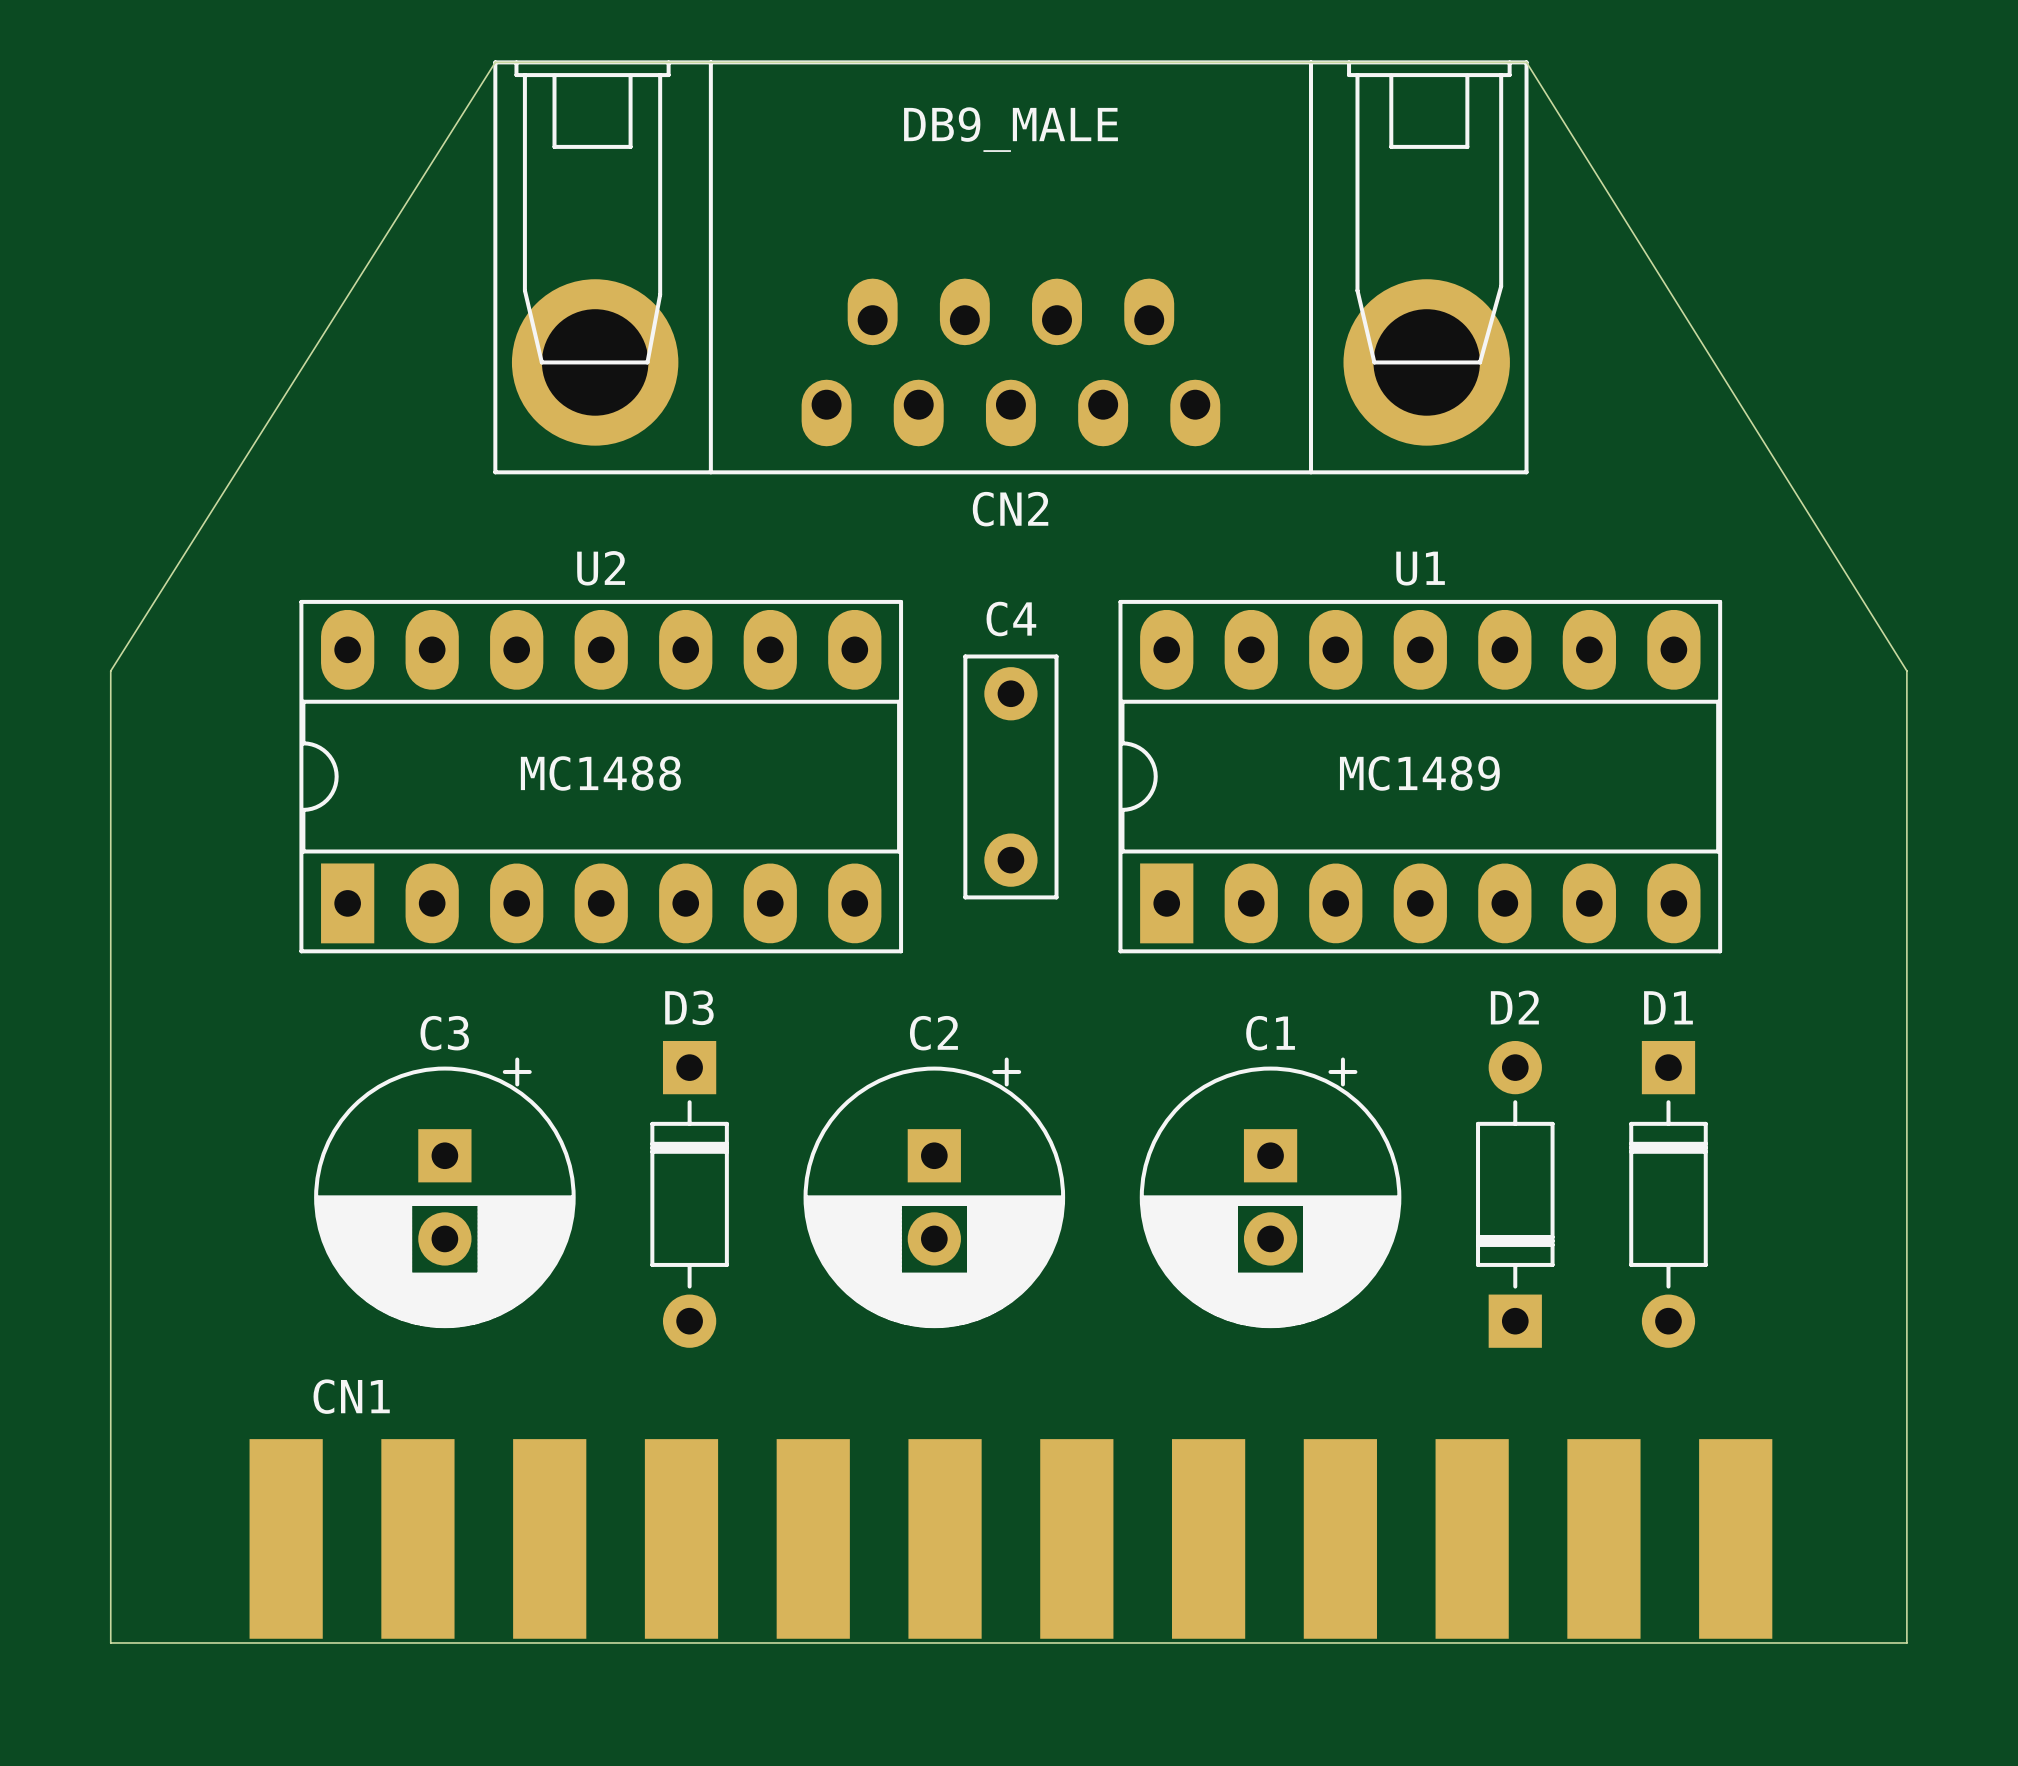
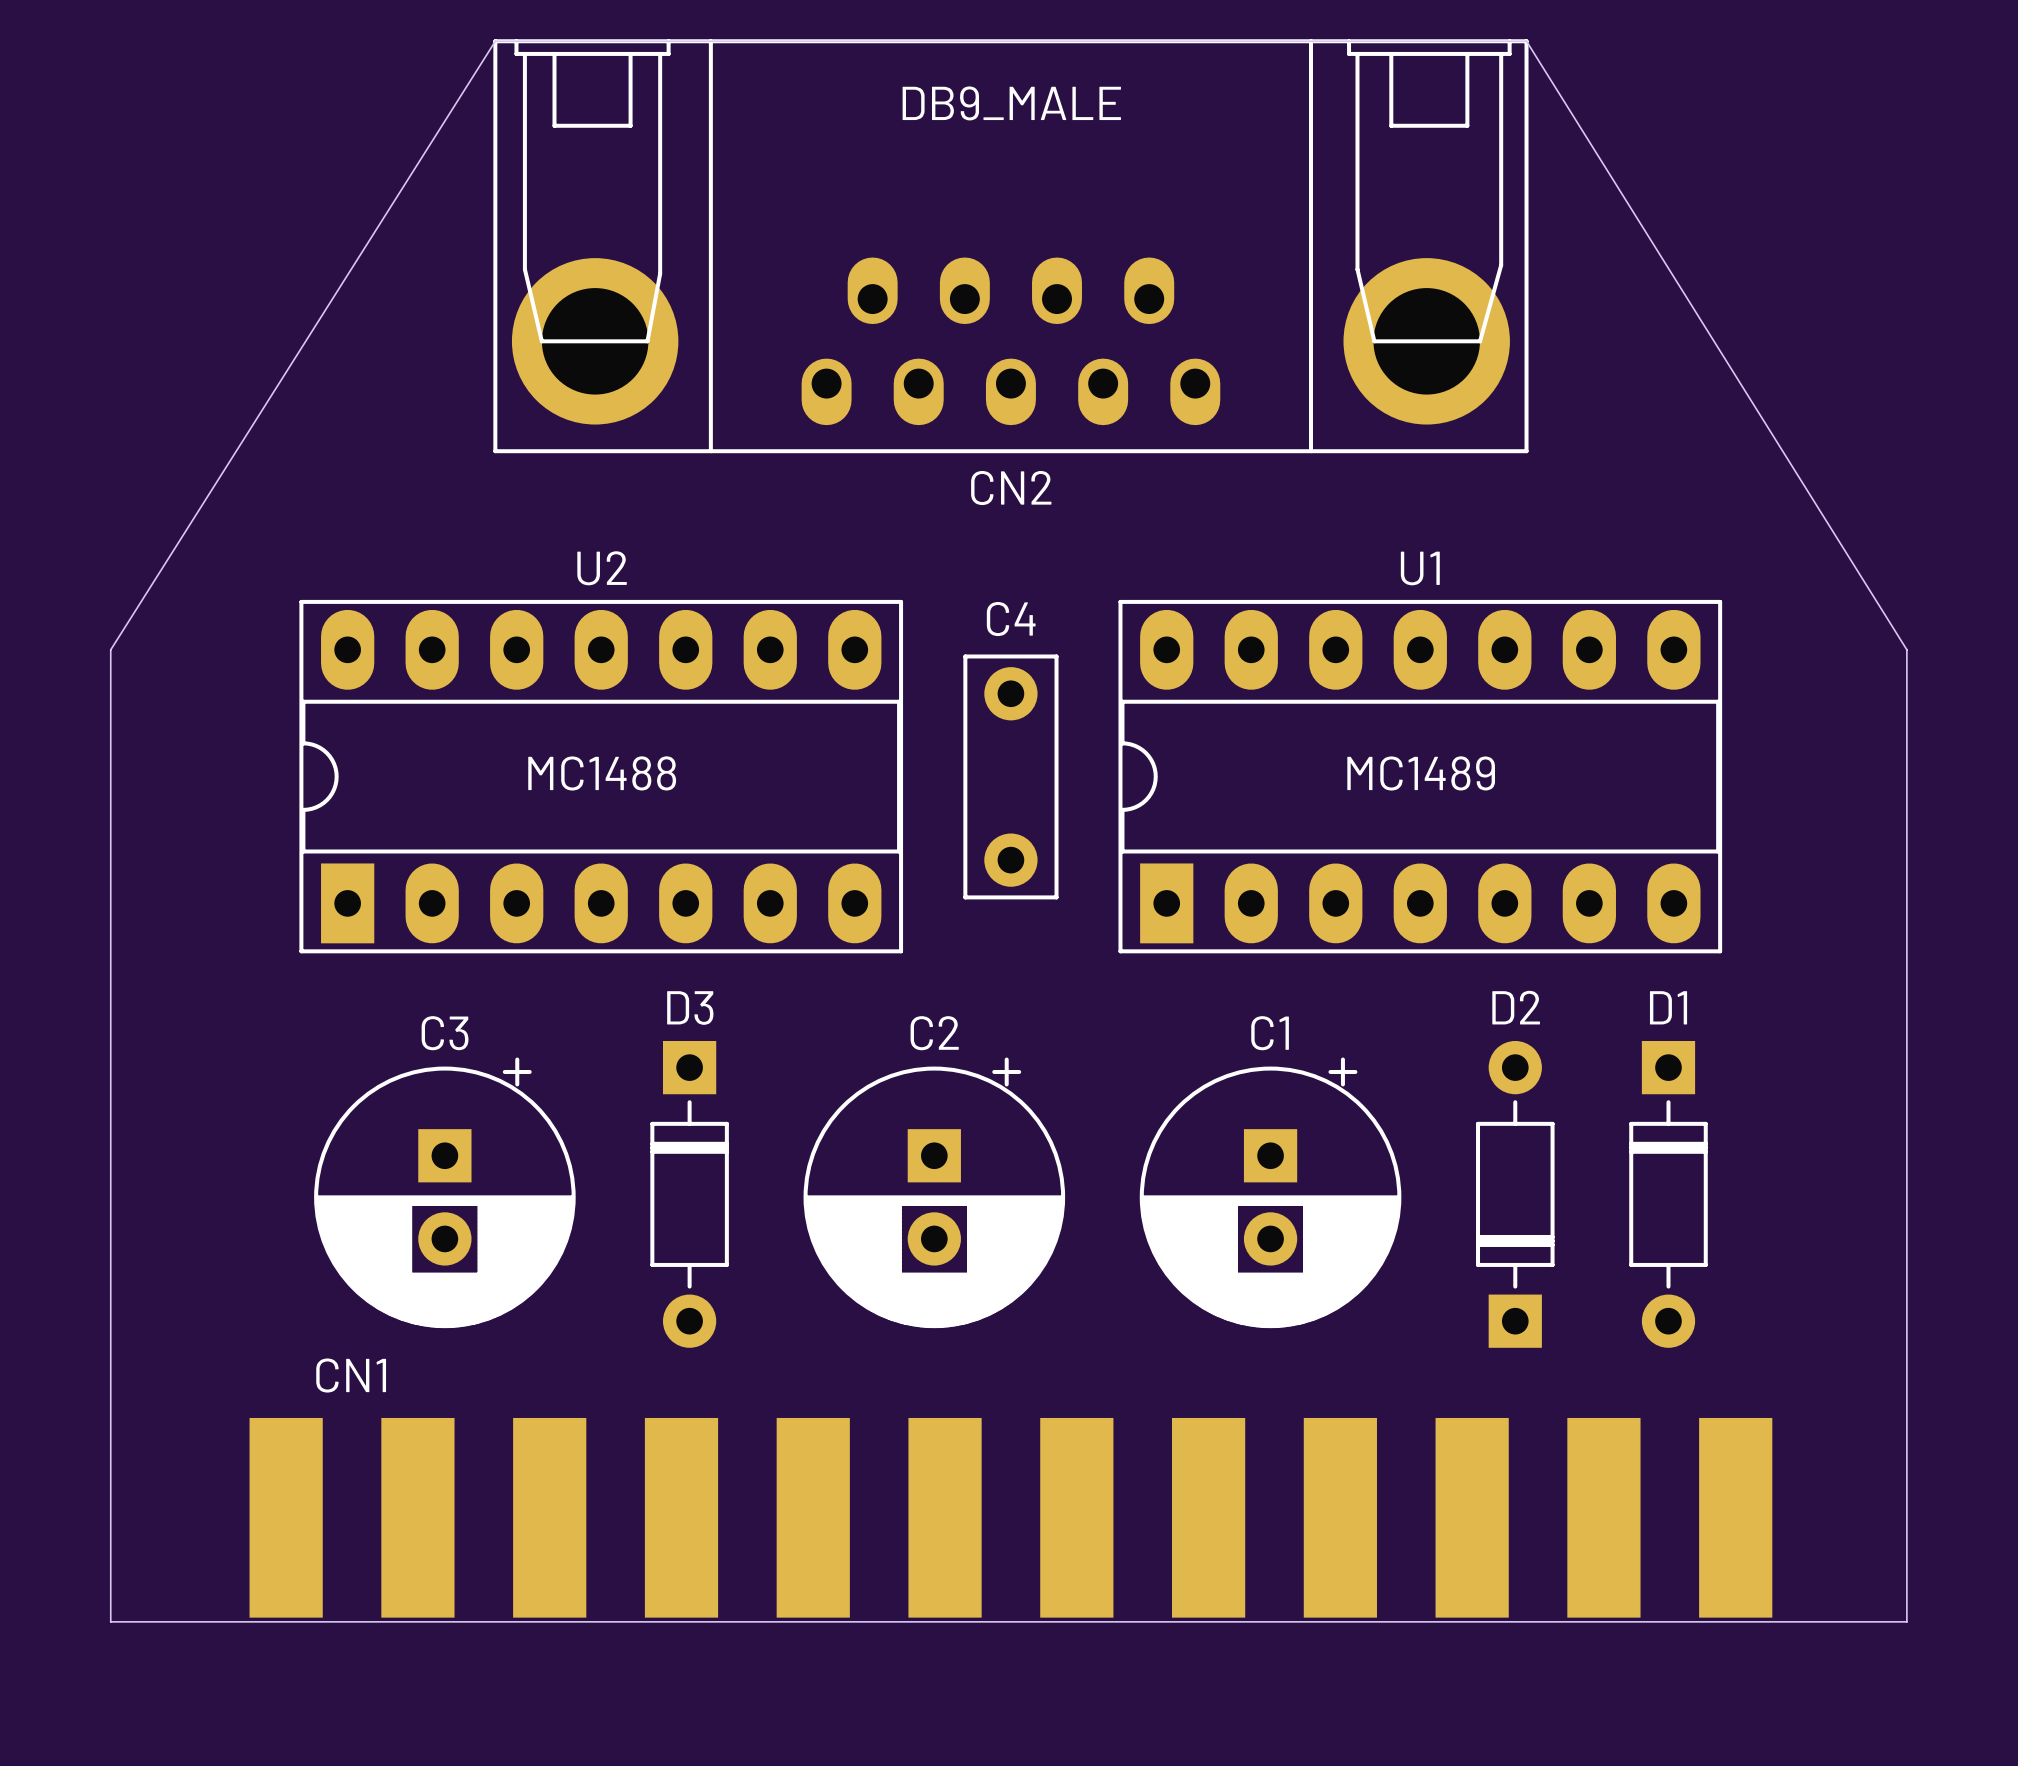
CN2 position: (1010, 267) -> (1010, 246)
board edge: (110, 670) (495, 62) (1526, 62) (1906, 670) -> (110, 670) (110, 649) (495, 41) (1526, 41) (1906, 649) (1906, 670)
CN1 position: (1010, 1538) -> (1010, 1517)
board edge: (110, 1621) (110, 1642) (1906, 1642) (1906, 1621) -> (110, 1621) (1906, 1621)

